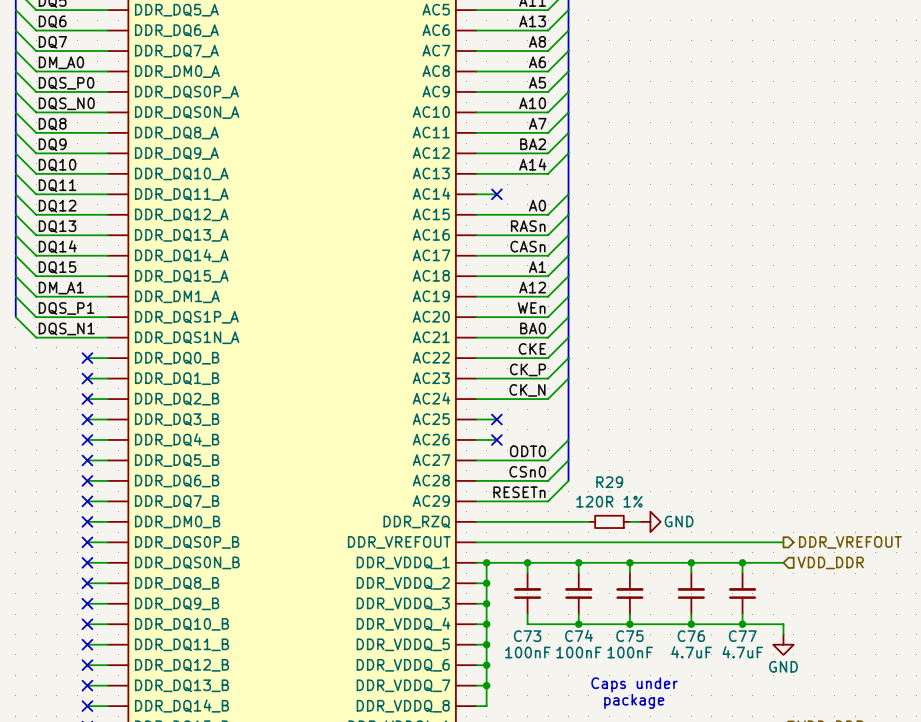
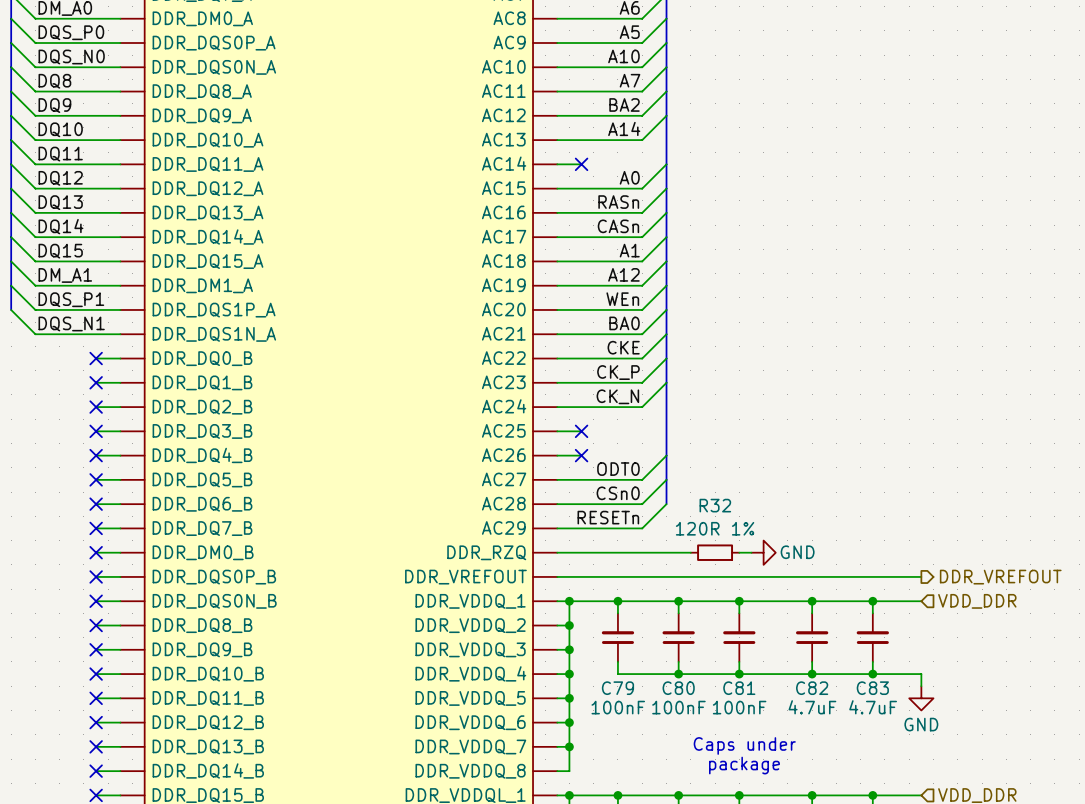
R29 name: R29 (609, 482) -> R32 (715, 505)
C74 name: C74 (578, 635) -> C80 (678, 688)
C73 name: C73 (527, 636) -> C79 (617, 688)
C75 name: C75 (629, 636) -> C81 (739, 688)
C76 name: C76 (691, 636) -> C82 (812, 688)
C77 name: C77 (742, 636) -> C83 (872, 688)

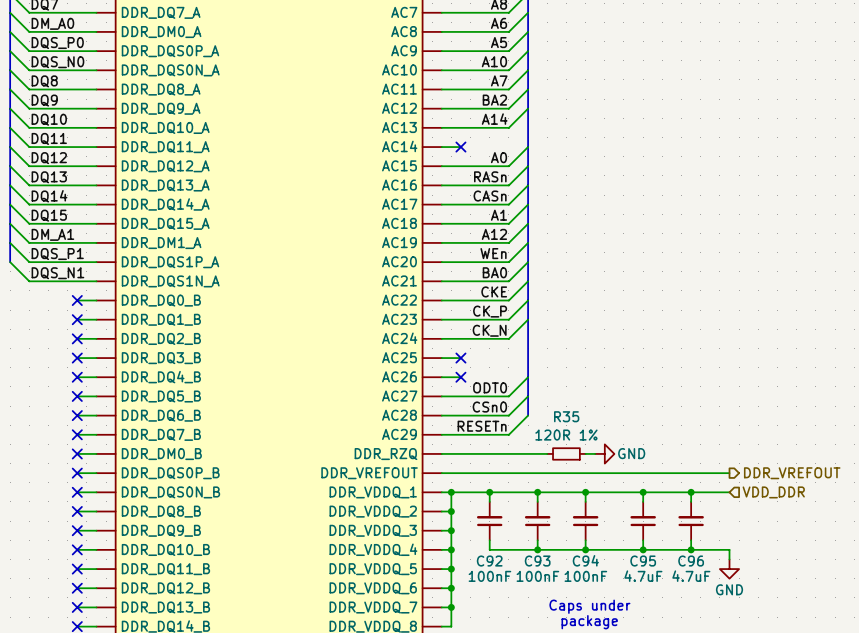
R32 name: R32 (715, 505) -> R35 (566, 416)
C79 name: C79 (617, 688) -> C92 (489, 561)
C80 name: C80 (678, 688) -> C93 (537, 561)
C81 name: C81 (739, 688) -> C94 (585, 560)
C82 name: C82 (812, 688) -> C95 (643, 561)
C83 name: C83 (872, 688) -> C96 (691, 561)

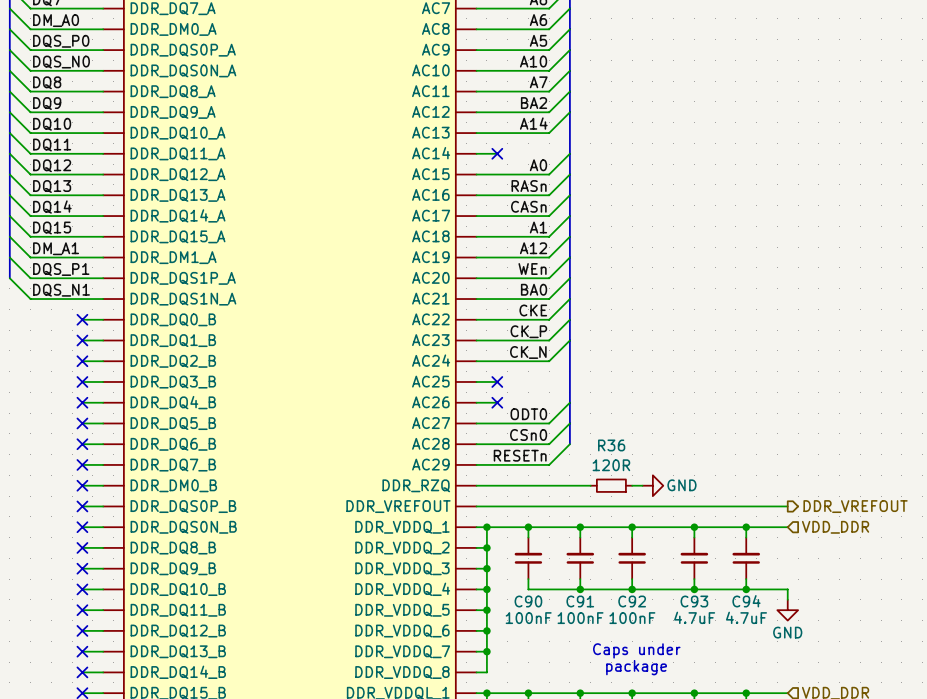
R35 name: R35 (566, 416) -> R36 (611, 445)
R35 value: 120R 1% (566, 435) -> 120R (611, 465)
C94 name: C94 (585, 560) -> C92 (632, 601)
C92 name: C92 (489, 561) -> C90 (528, 601)
C93 name: C93 (537, 561) -> C91 (580, 601)
C95 name: C95 (643, 561) -> C93 (694, 601)
C96 name: C96 (691, 561) -> C94 (746, 601)

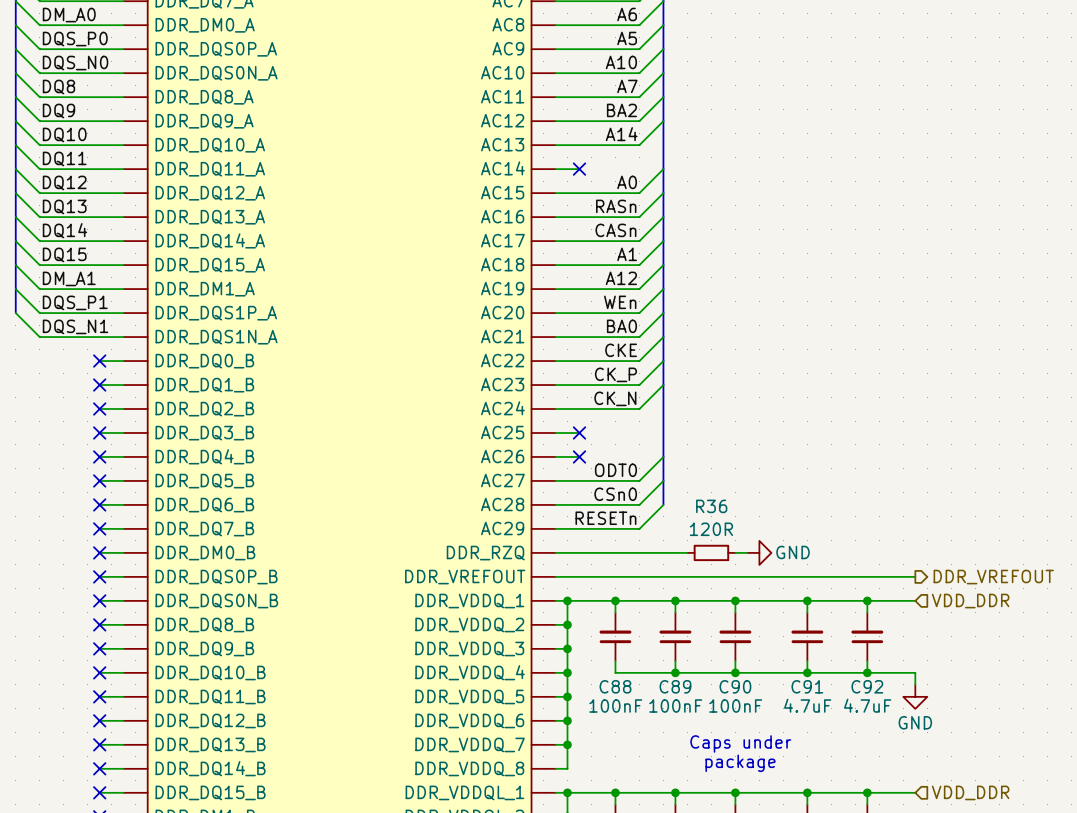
C90 name: C90 (528, 601) -> C88 (615, 686)
C91 name: C91 (580, 601) -> C89 (675, 686)
C92 name: C92 (632, 601) -> C90 (735, 686)
C93 name: C93 (694, 601) -> C91 (807, 686)
C94 name: C94 (746, 601) -> C92 (867, 686)

